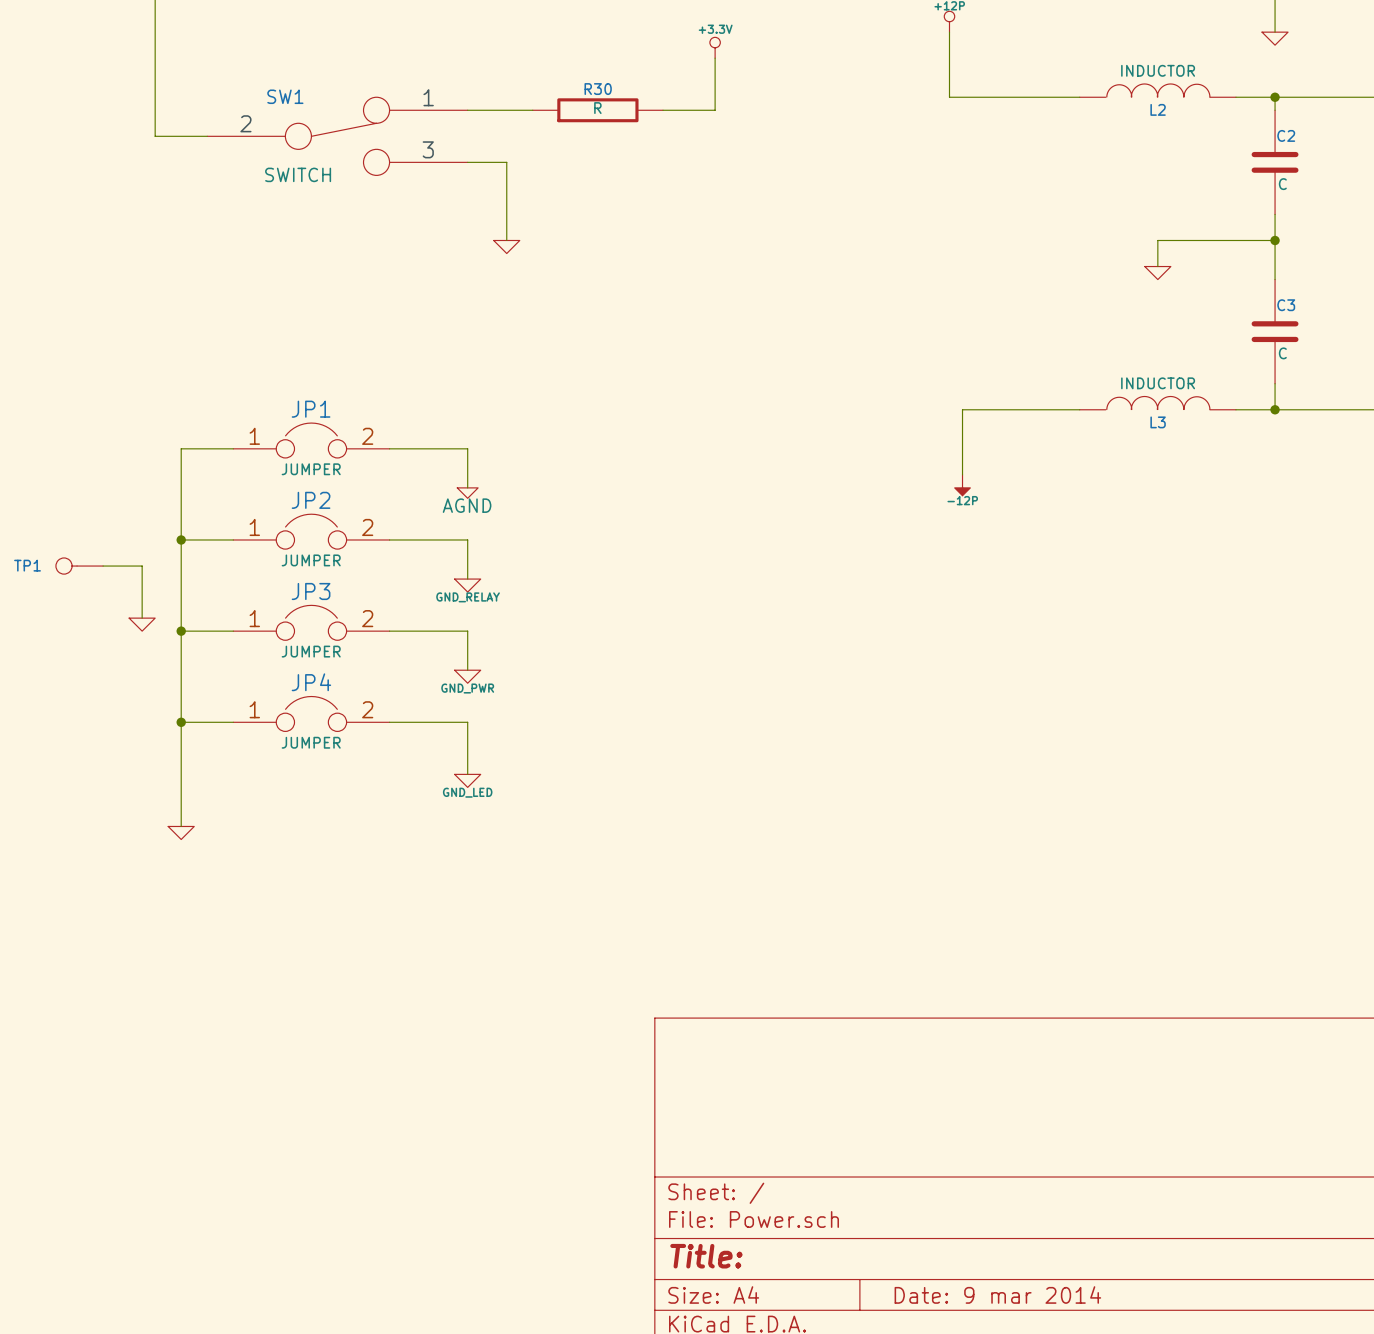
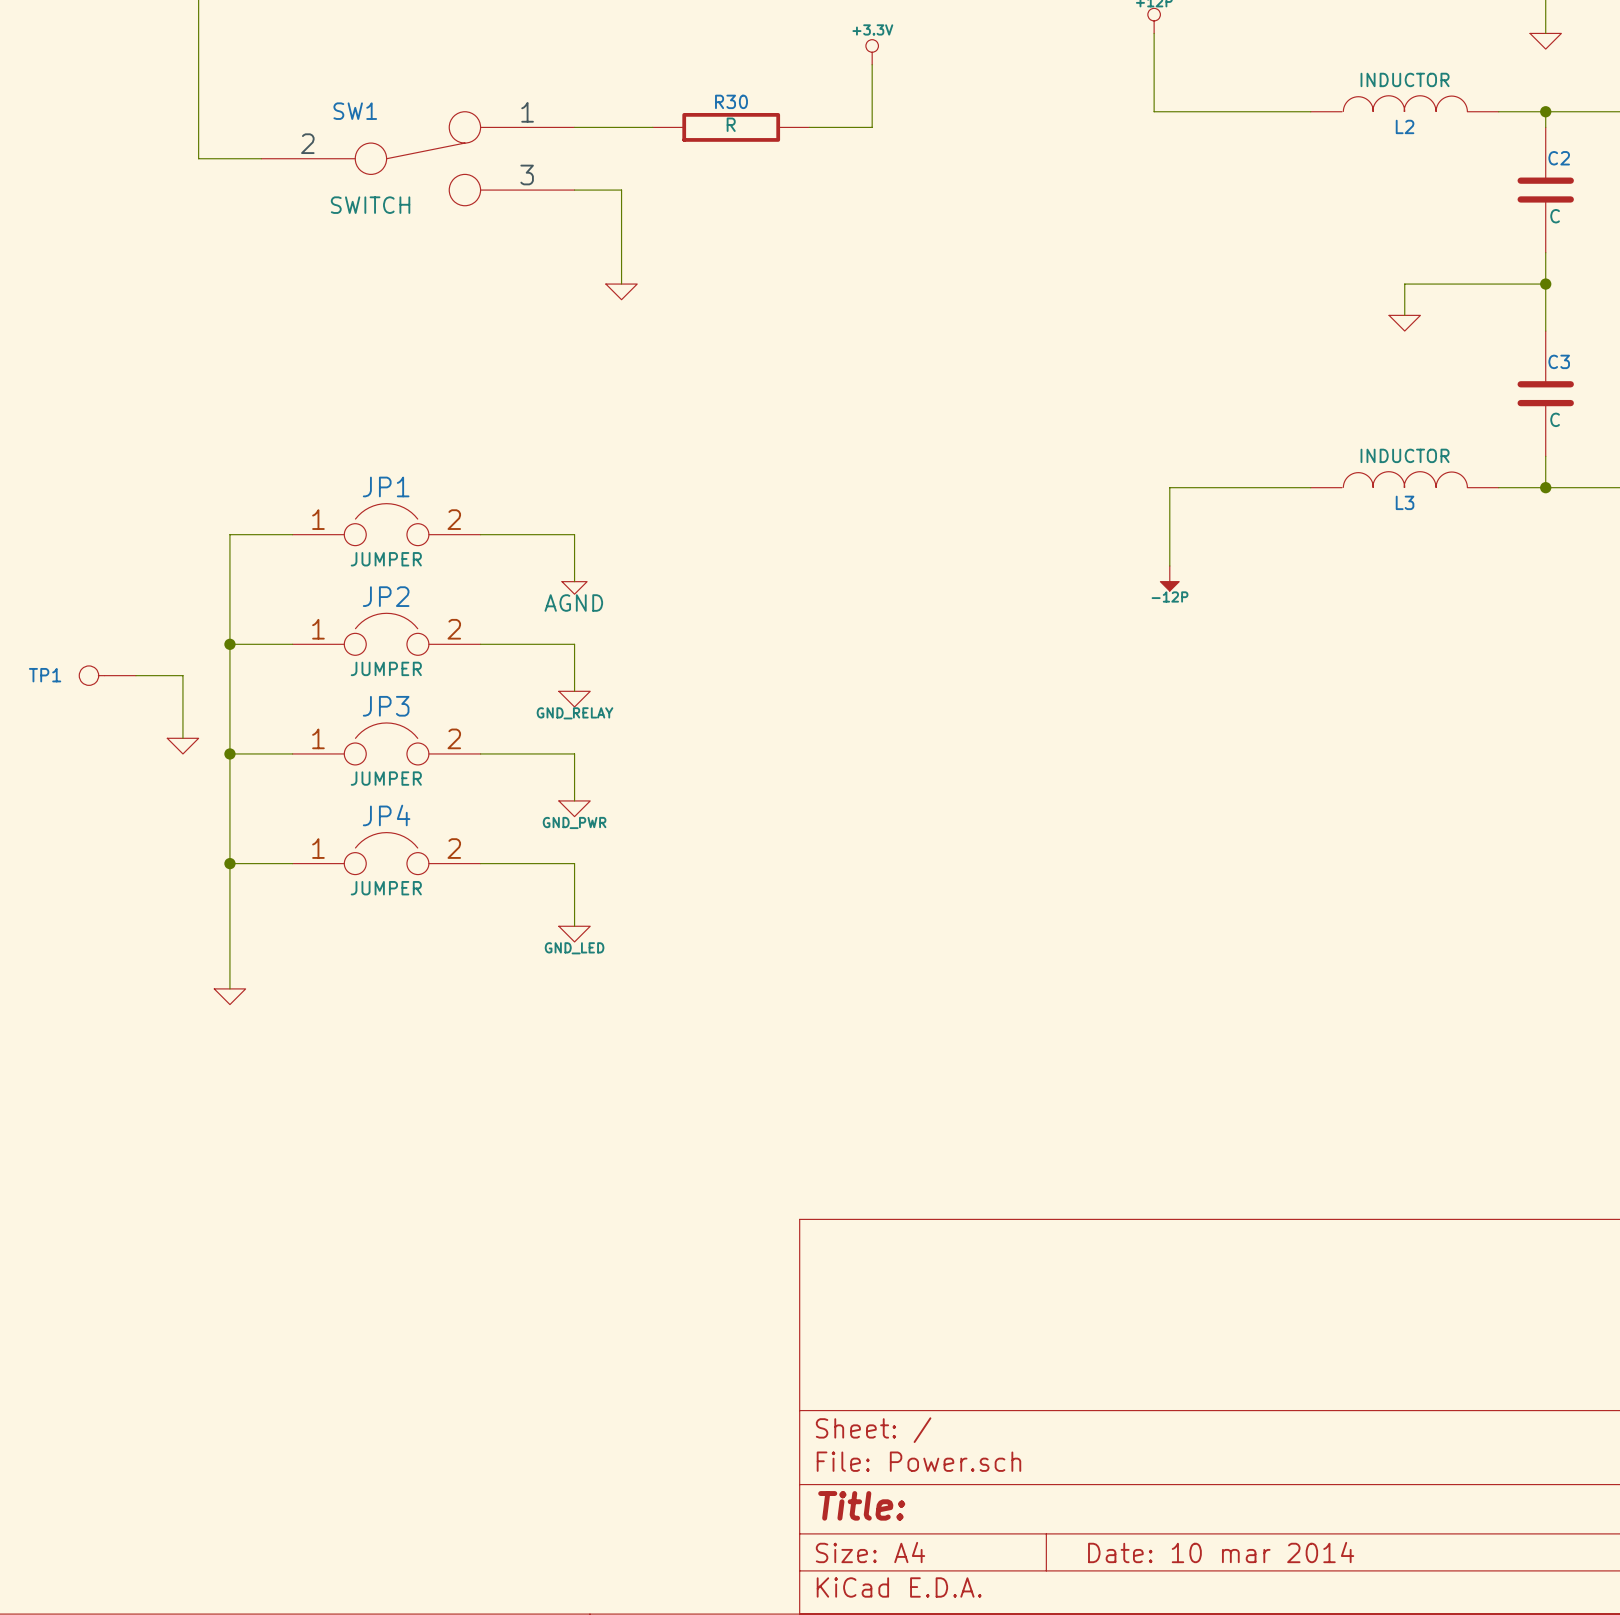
title block: Date: 9 mar 2014 (997, 1295) -> Date: 10 mar 2014 (1221, 1552)

